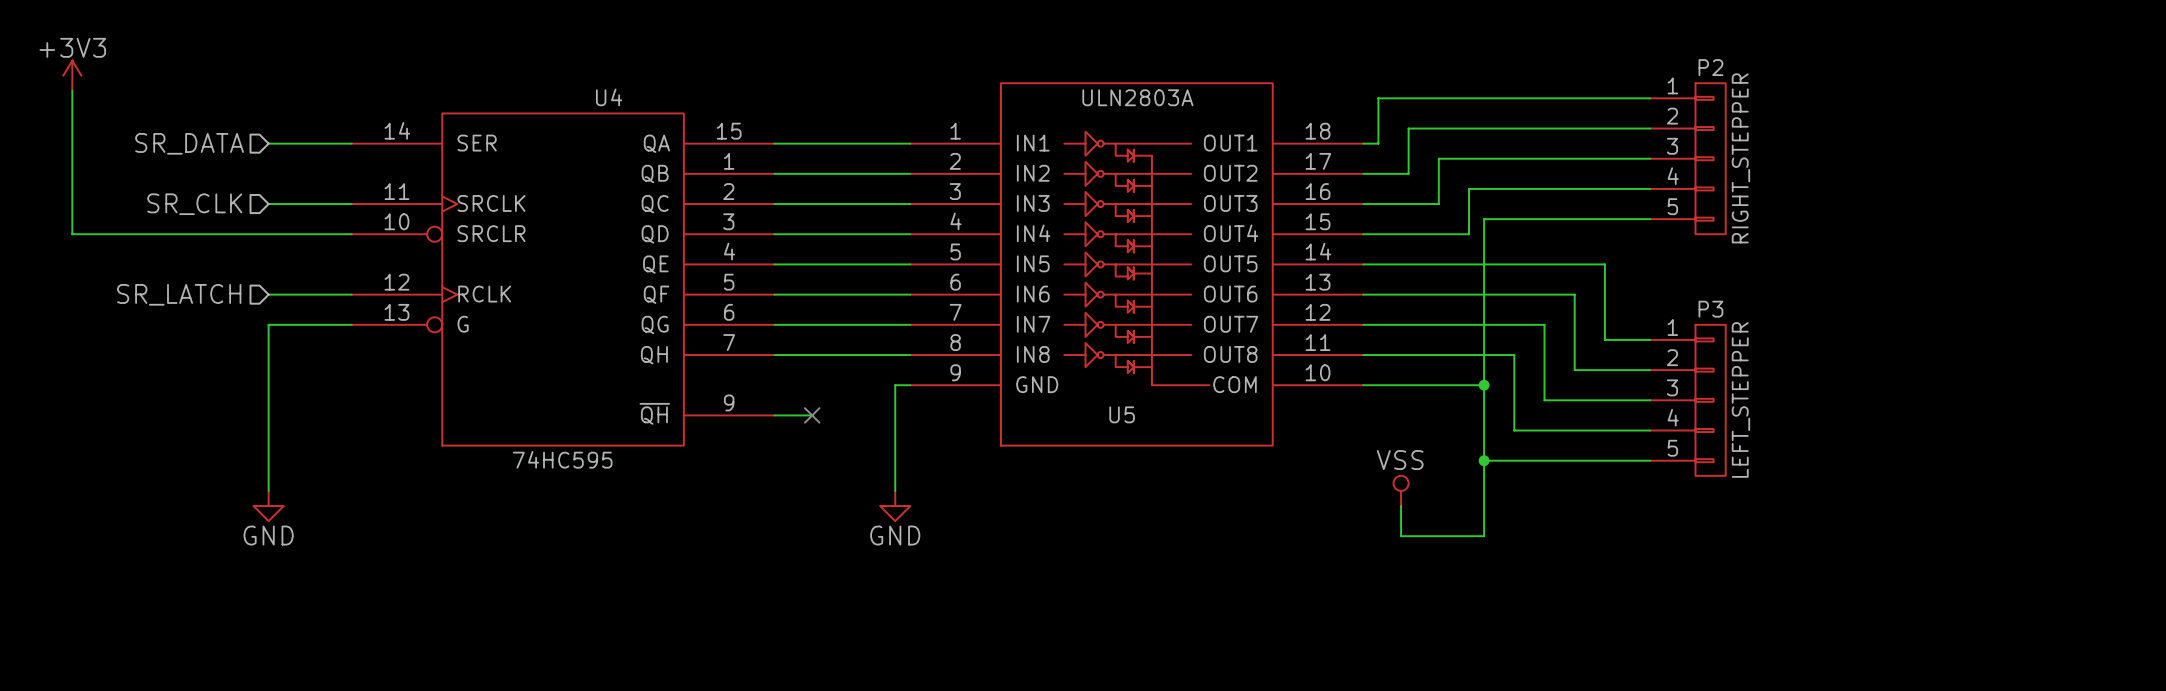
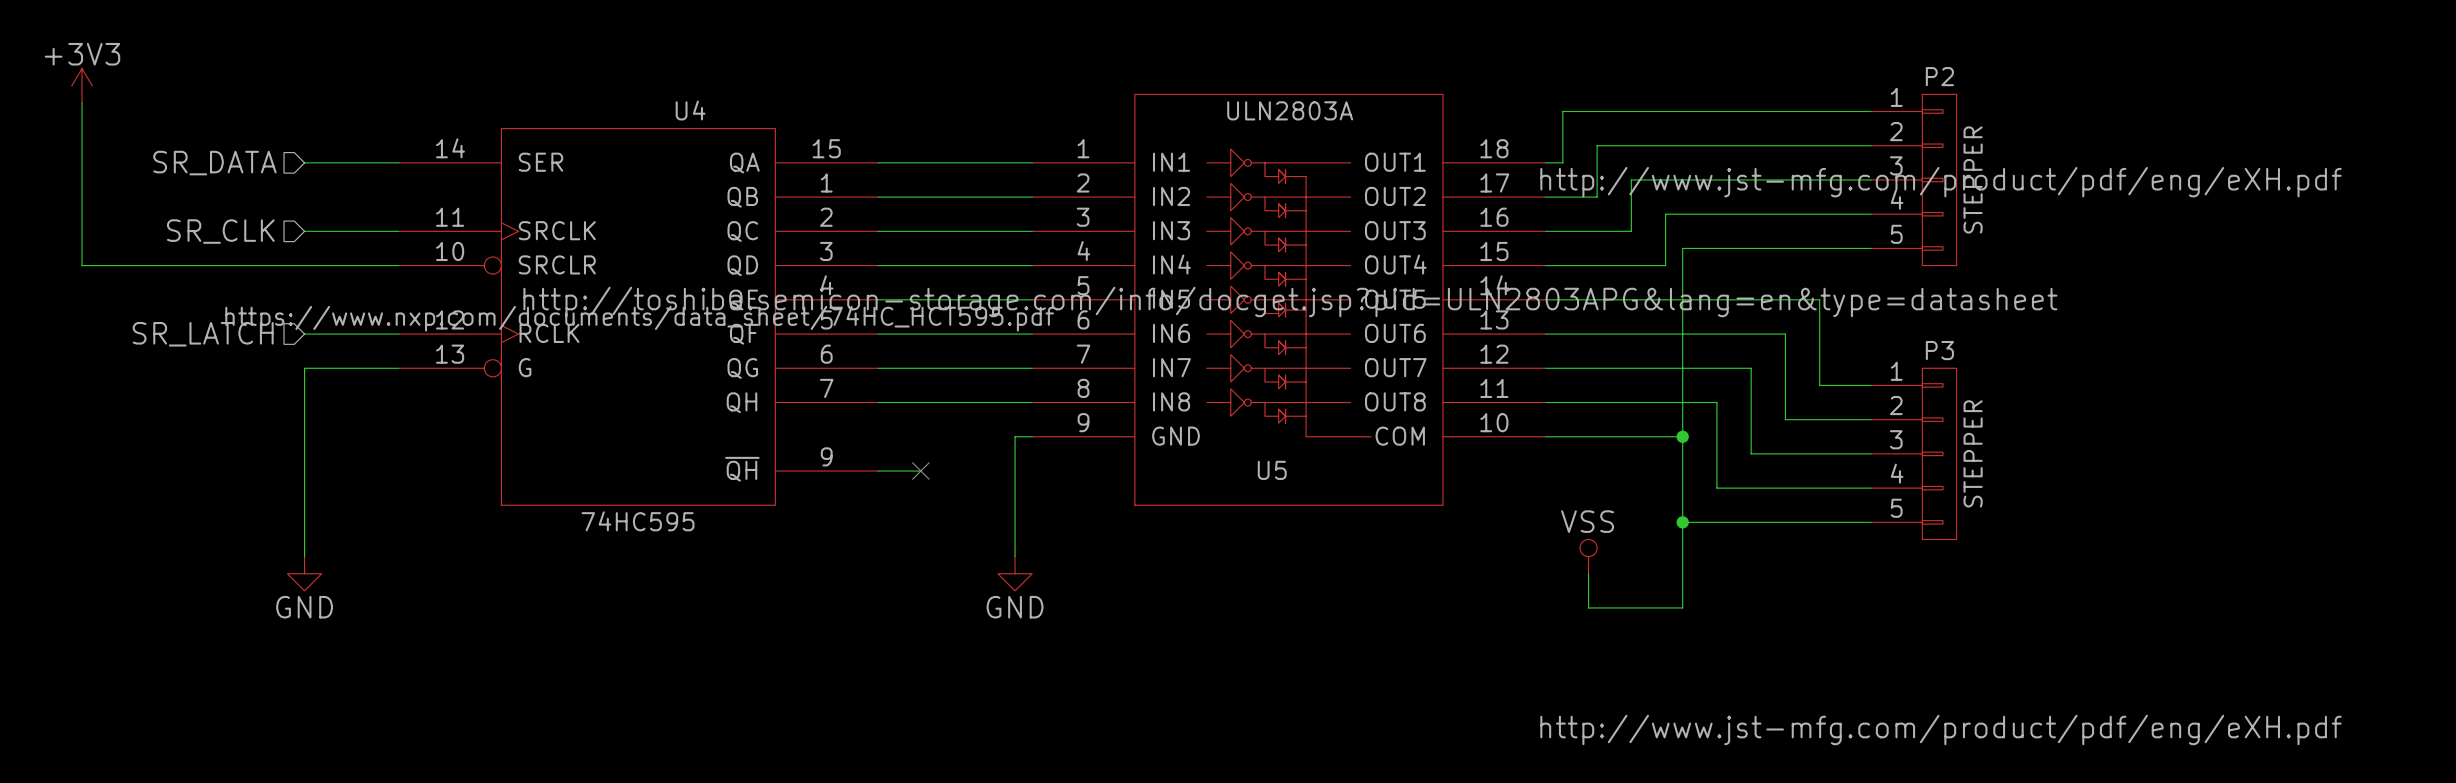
P2 value: RIGHT_STEPPER (1740, 158) -> STEPPER (1973, 179)
P2 text: none -> http://www.jst-mfg.com/product/pdf/eng/eXH.pdf (1940, 182)
U5 text: none -> http://toshiba.semicon-storage.com/info/docget.jsp?pid=ULN2803APG&lang=en&type=datasheet (1290, 301)
U4 text: none -> https://www.nxp.com/documents/data_sheet/74HC_HCT595.pdf (639, 318)
P3 value: LEFT_STEPPER (1740, 399) -> STEPPER (1973, 453)
P3 text: none -> http://www.jst-mfg.com/product/pdf/eng/eXH.pdf (1940, 729)

